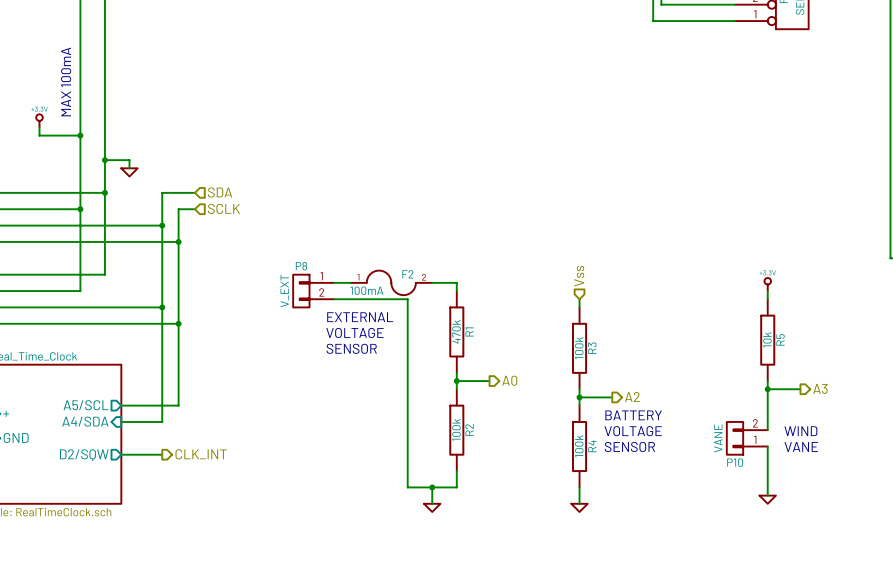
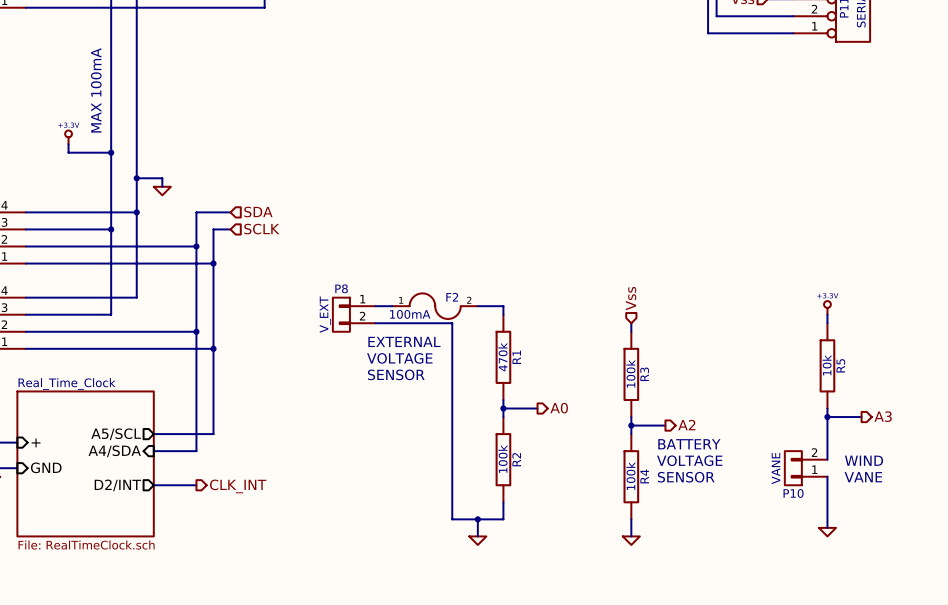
sheet pin: D2/SQW (84, 455) -> D2/INT (117, 485)

